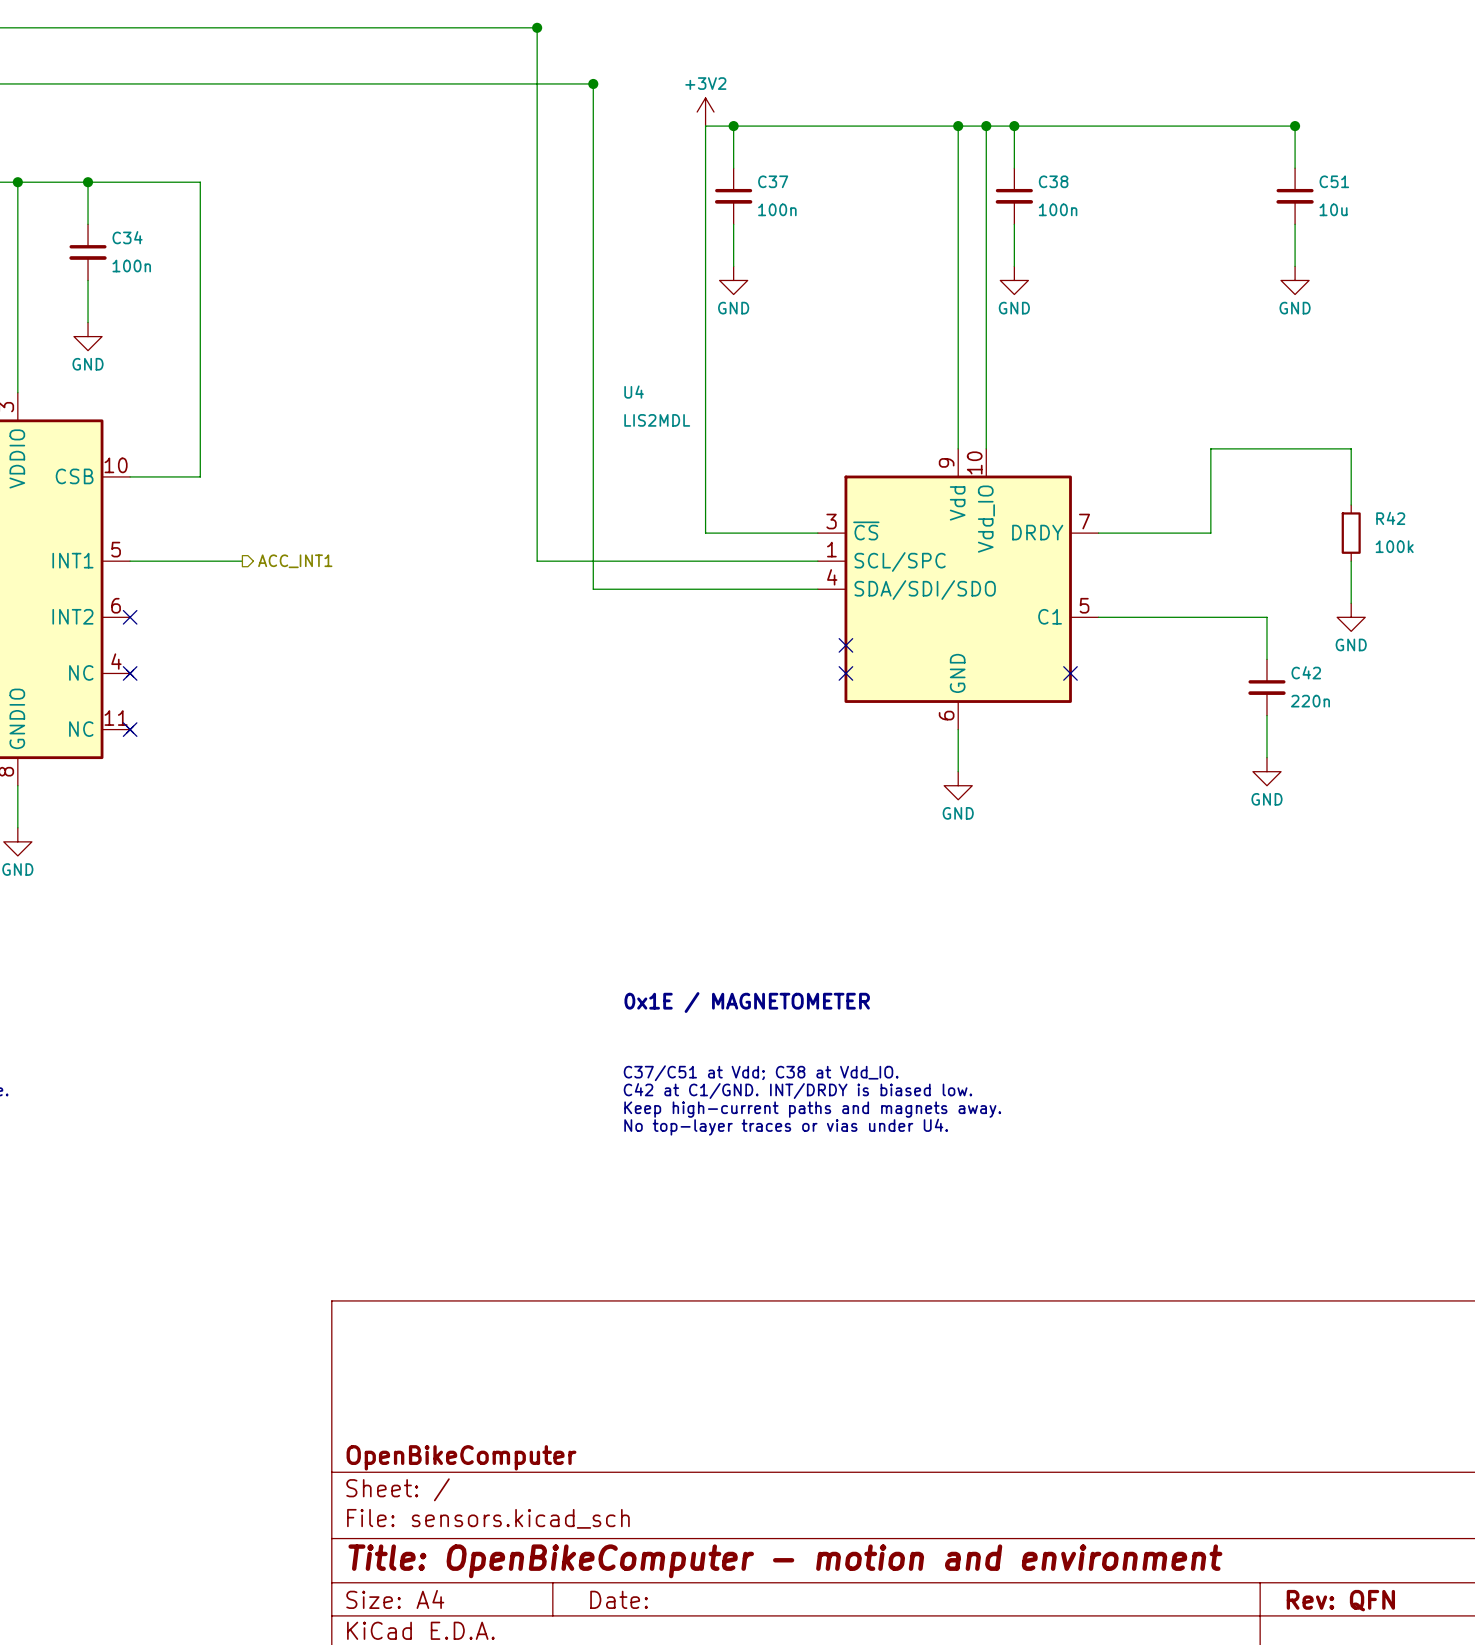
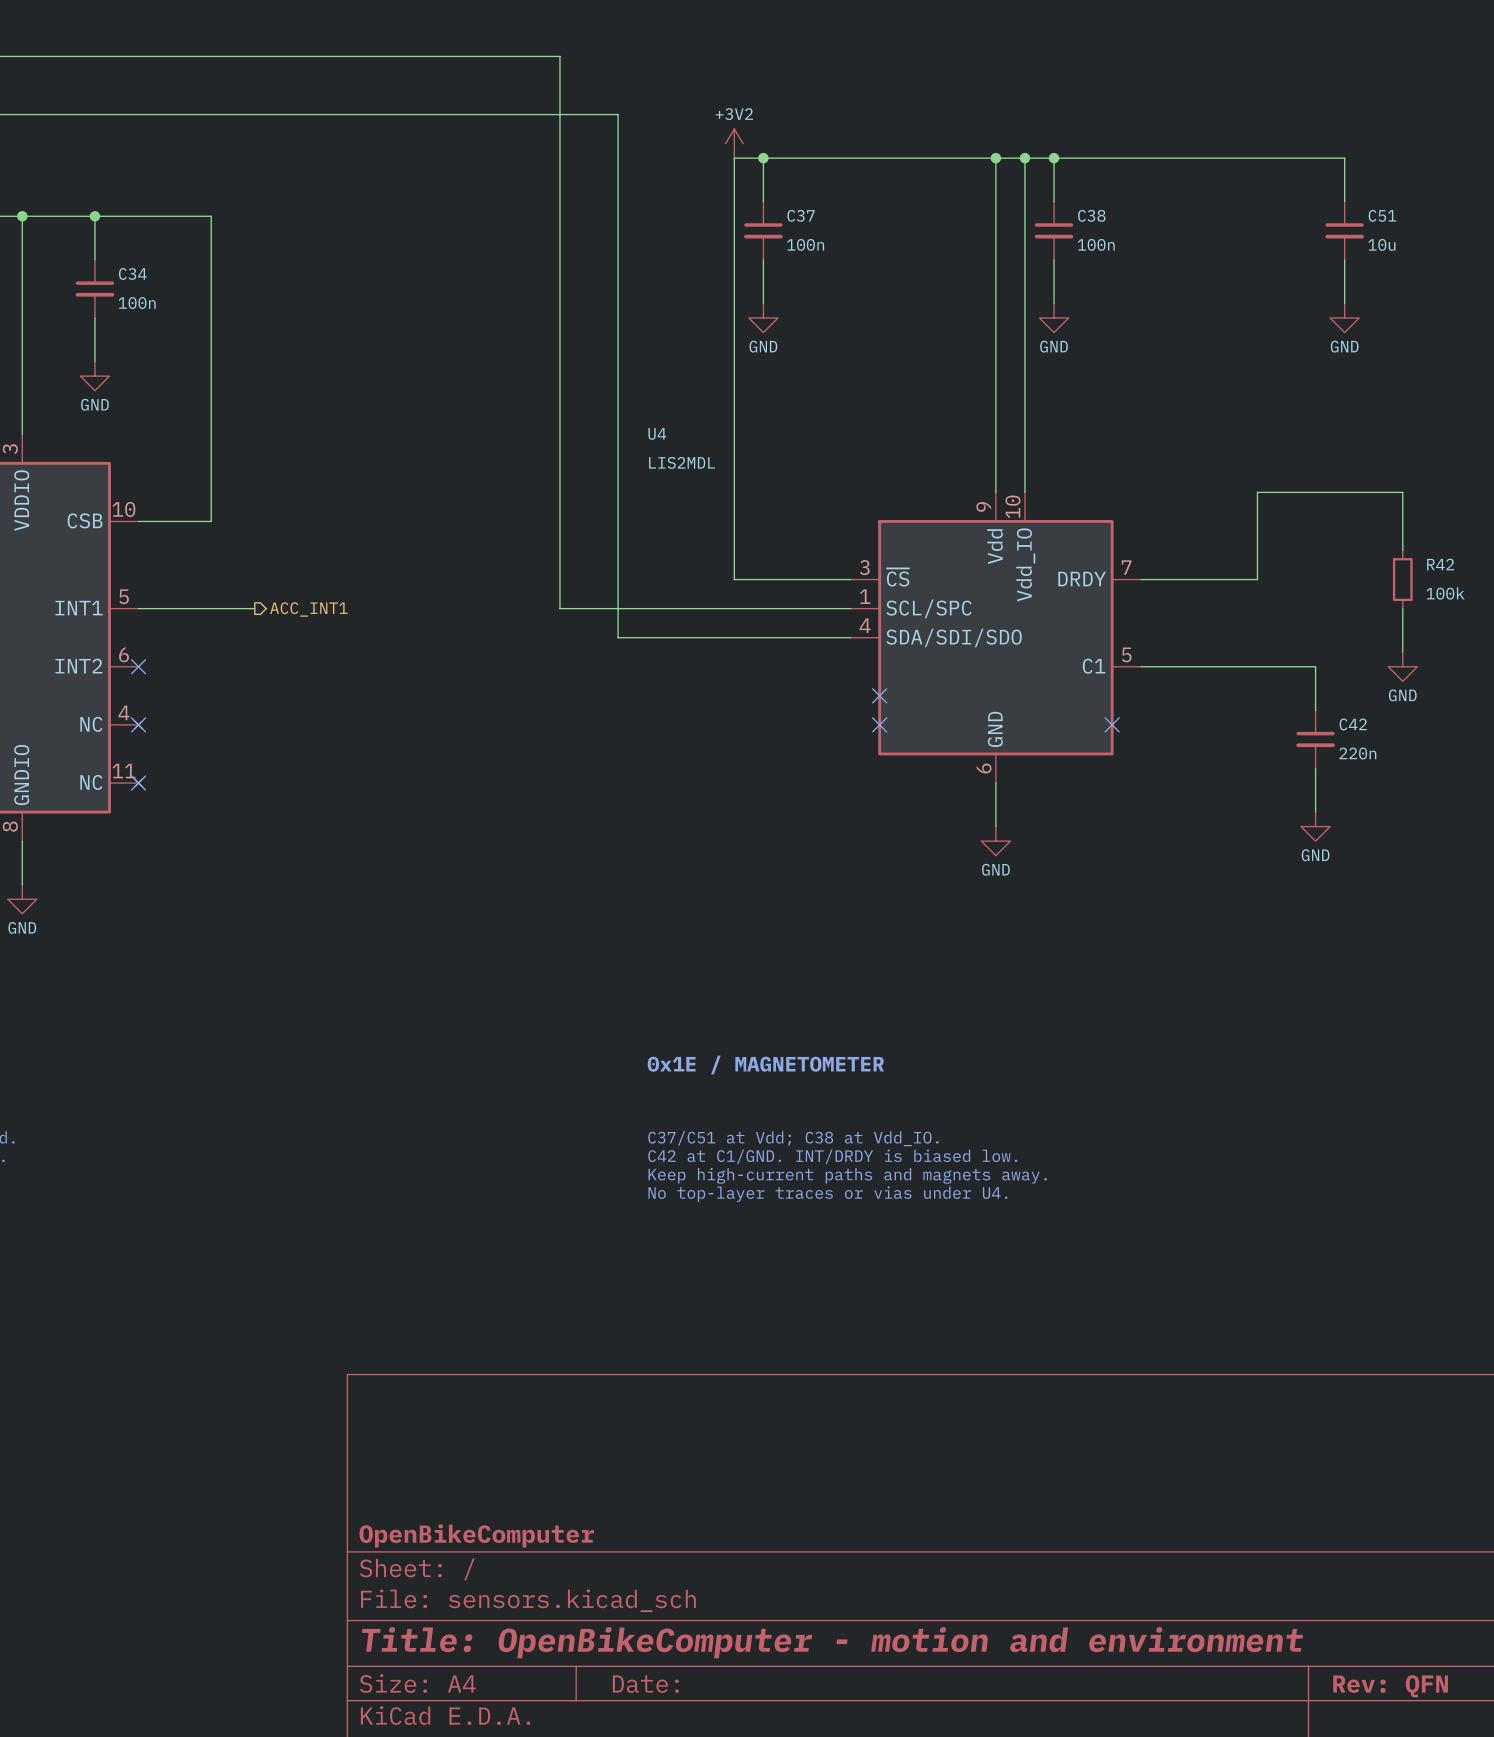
junction: (537, 27) -> none
junction: (593, 83) -> none
junction: (1295, 126) -> none

